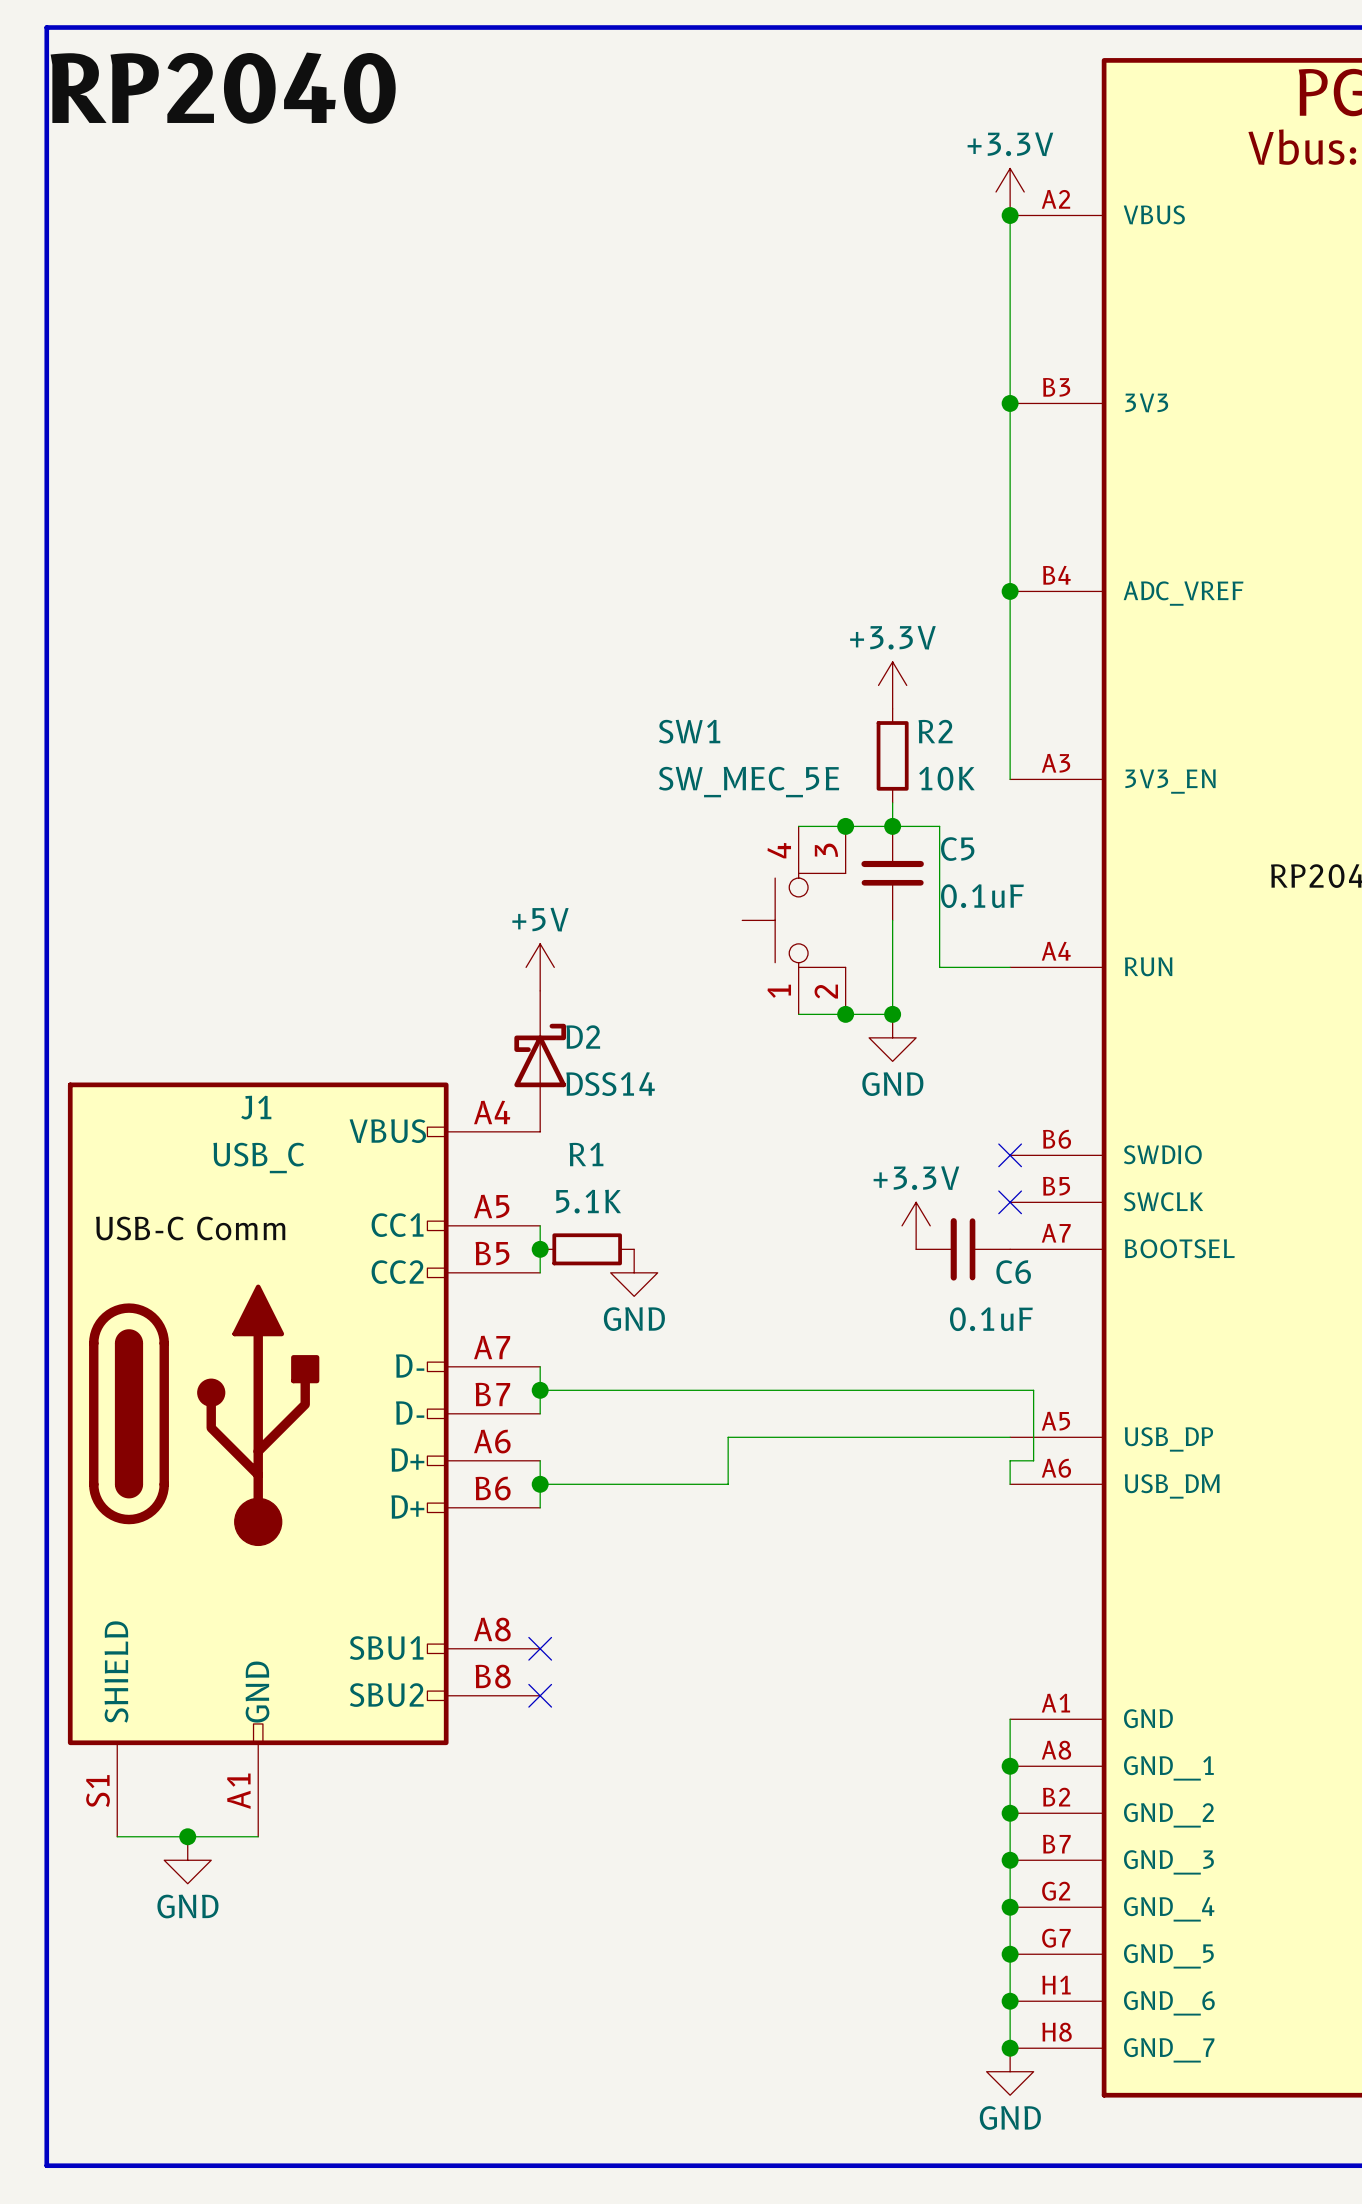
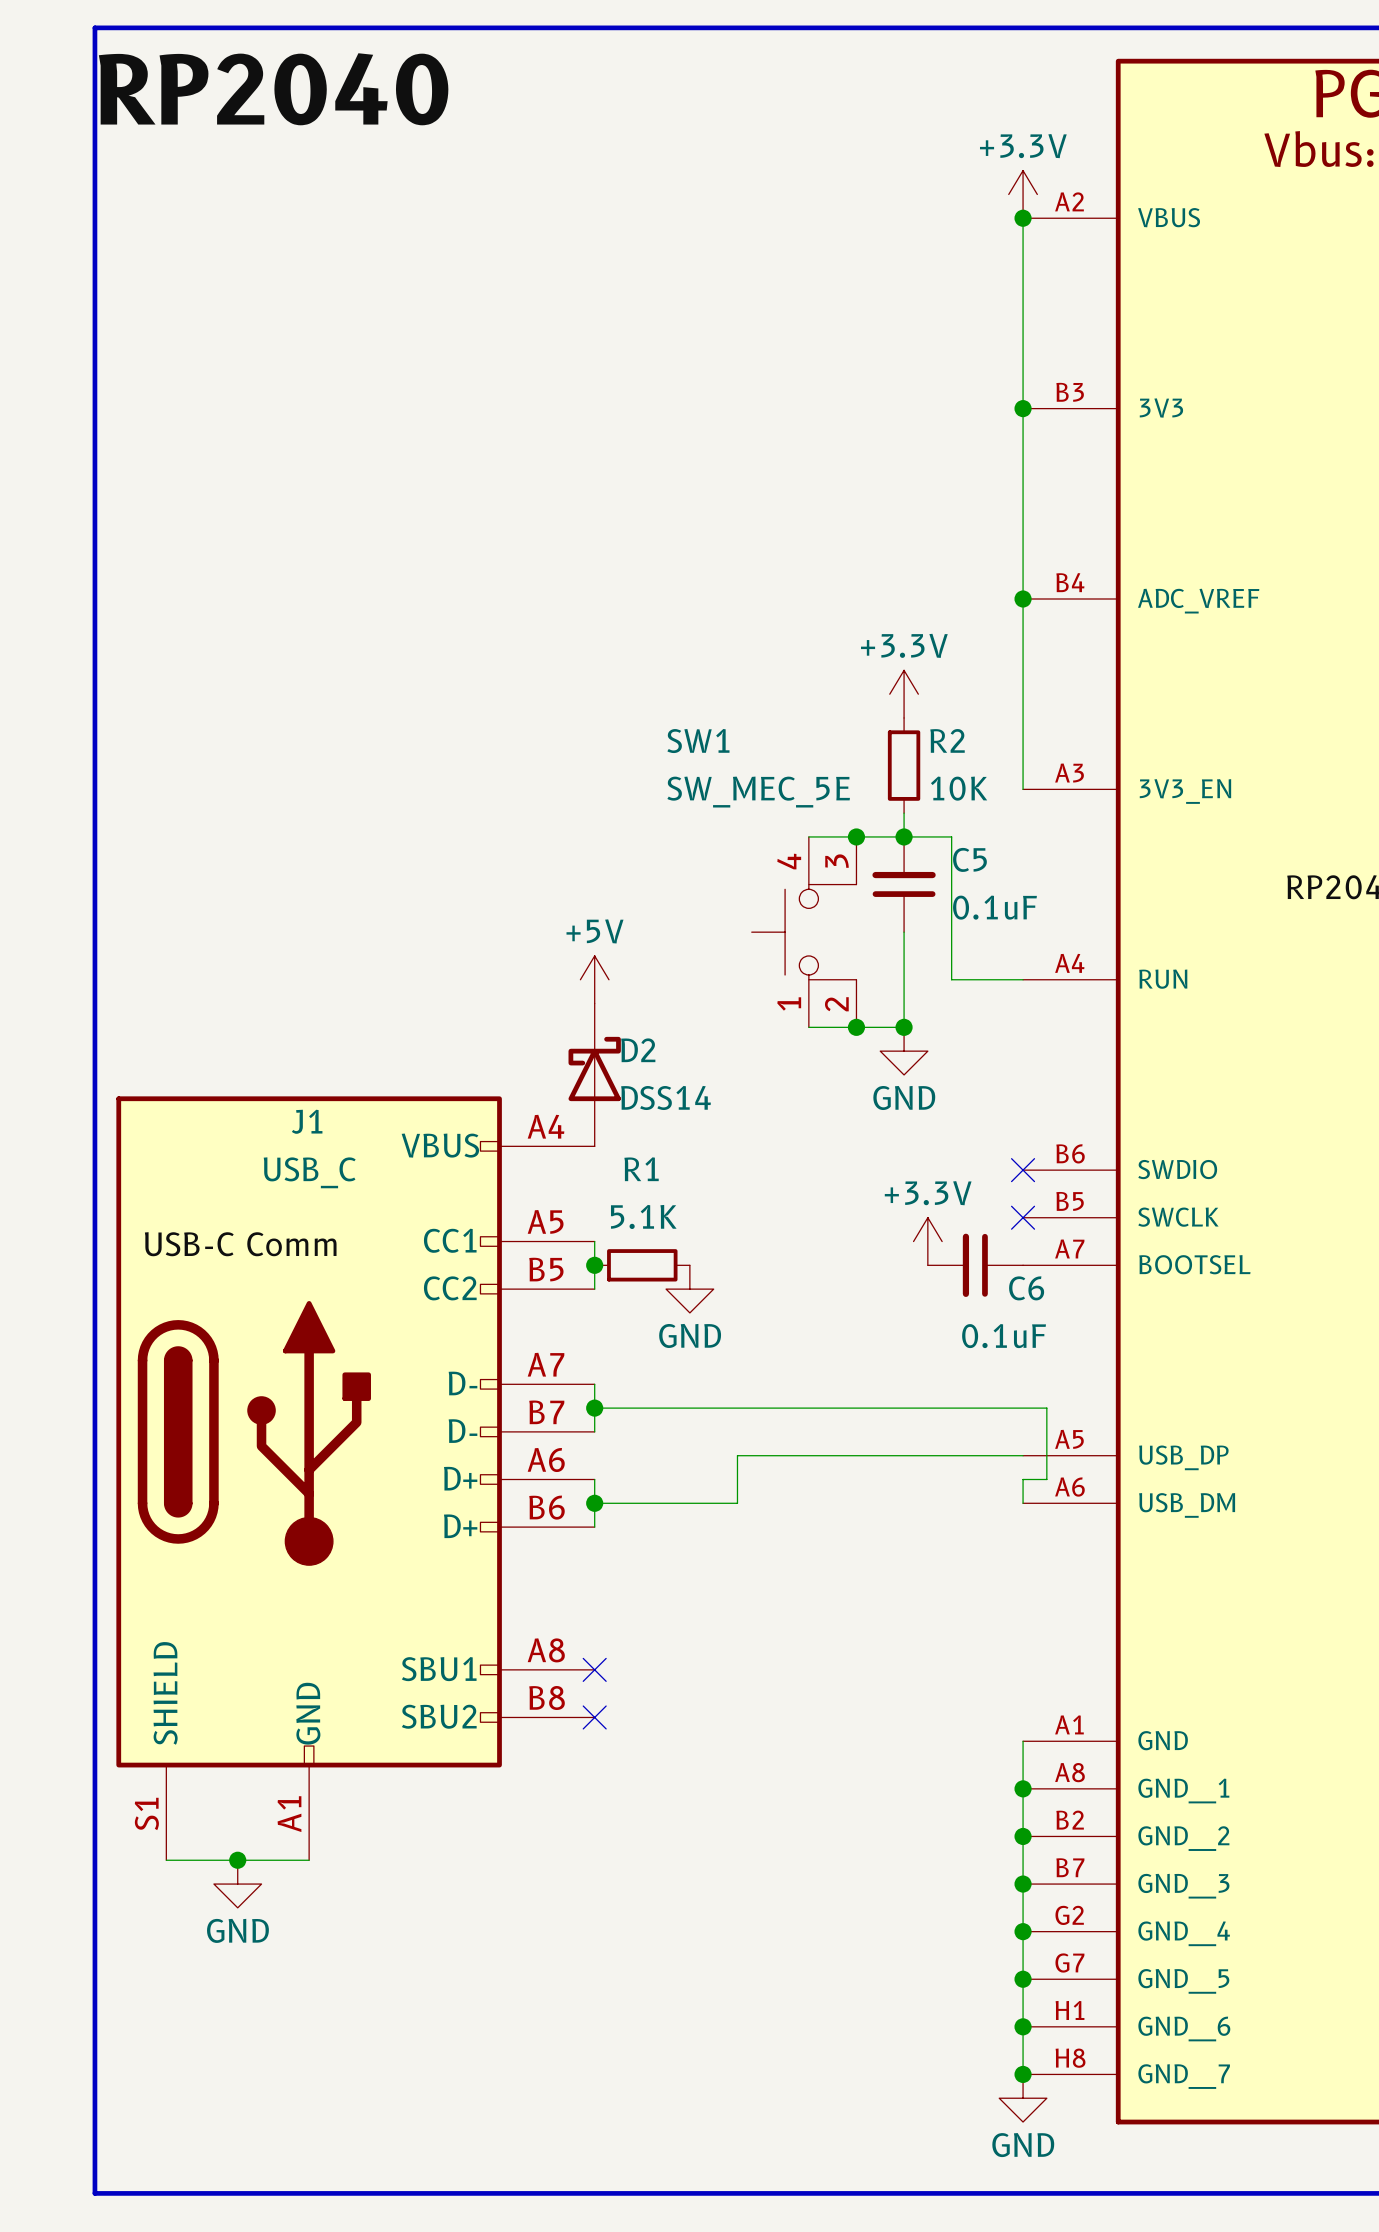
line: (93, 27) (46, 27) (46, 2165) (93, 2165) -> (94, 27) (94, 2193)
label position: RP2040 (223, 88) -> RP2040 (273, 89)
power symbol position: +5V (540, 967) -> +5V (594, 979)
D2 position: (540, 1061) -> (594, 1074)
wire: (540, 1225) (540, 1272) -> (594, 1241) (594, 1289)
label position: USB-C Comm (190, 1228) -> USB-C Comm (240, 1244)
junction position: (540, 1249) -> (594, 1265)
R1 position: (587, 1249) -> (642, 1265)
power symbol position: GND (634, 1272) -> GND (689, 1289)
wire: (540, 1366) (540, 1413) -> (594, 1384) (594, 1431)
wire: (540, 1390) (587, 1390) -> none
junction position: (540, 1390) -> (594, 1408)
J1 position: (304, 1459) -> (355, 1478)
wire: (540, 1460) (540, 1507) -> (594, 1479) (594, 1527)
wire: (540, 1484) (587, 1484) -> none
junction position: (540, 1484) -> (594, 1503)
no-connect mark: (540, 1648) -> none
no-connect mark: none -> (594, 1669)
no-connect mark: (540, 1695) -> none
no-connect mark: none -> (594, 1717)
wire: (117, 1836) (164, 1836) -> (261, 1860) (309, 1860)
junction position: (187, 1836) -> (237, 1860)
power symbol position: GND (187, 1860) -> GND (237, 1884)

